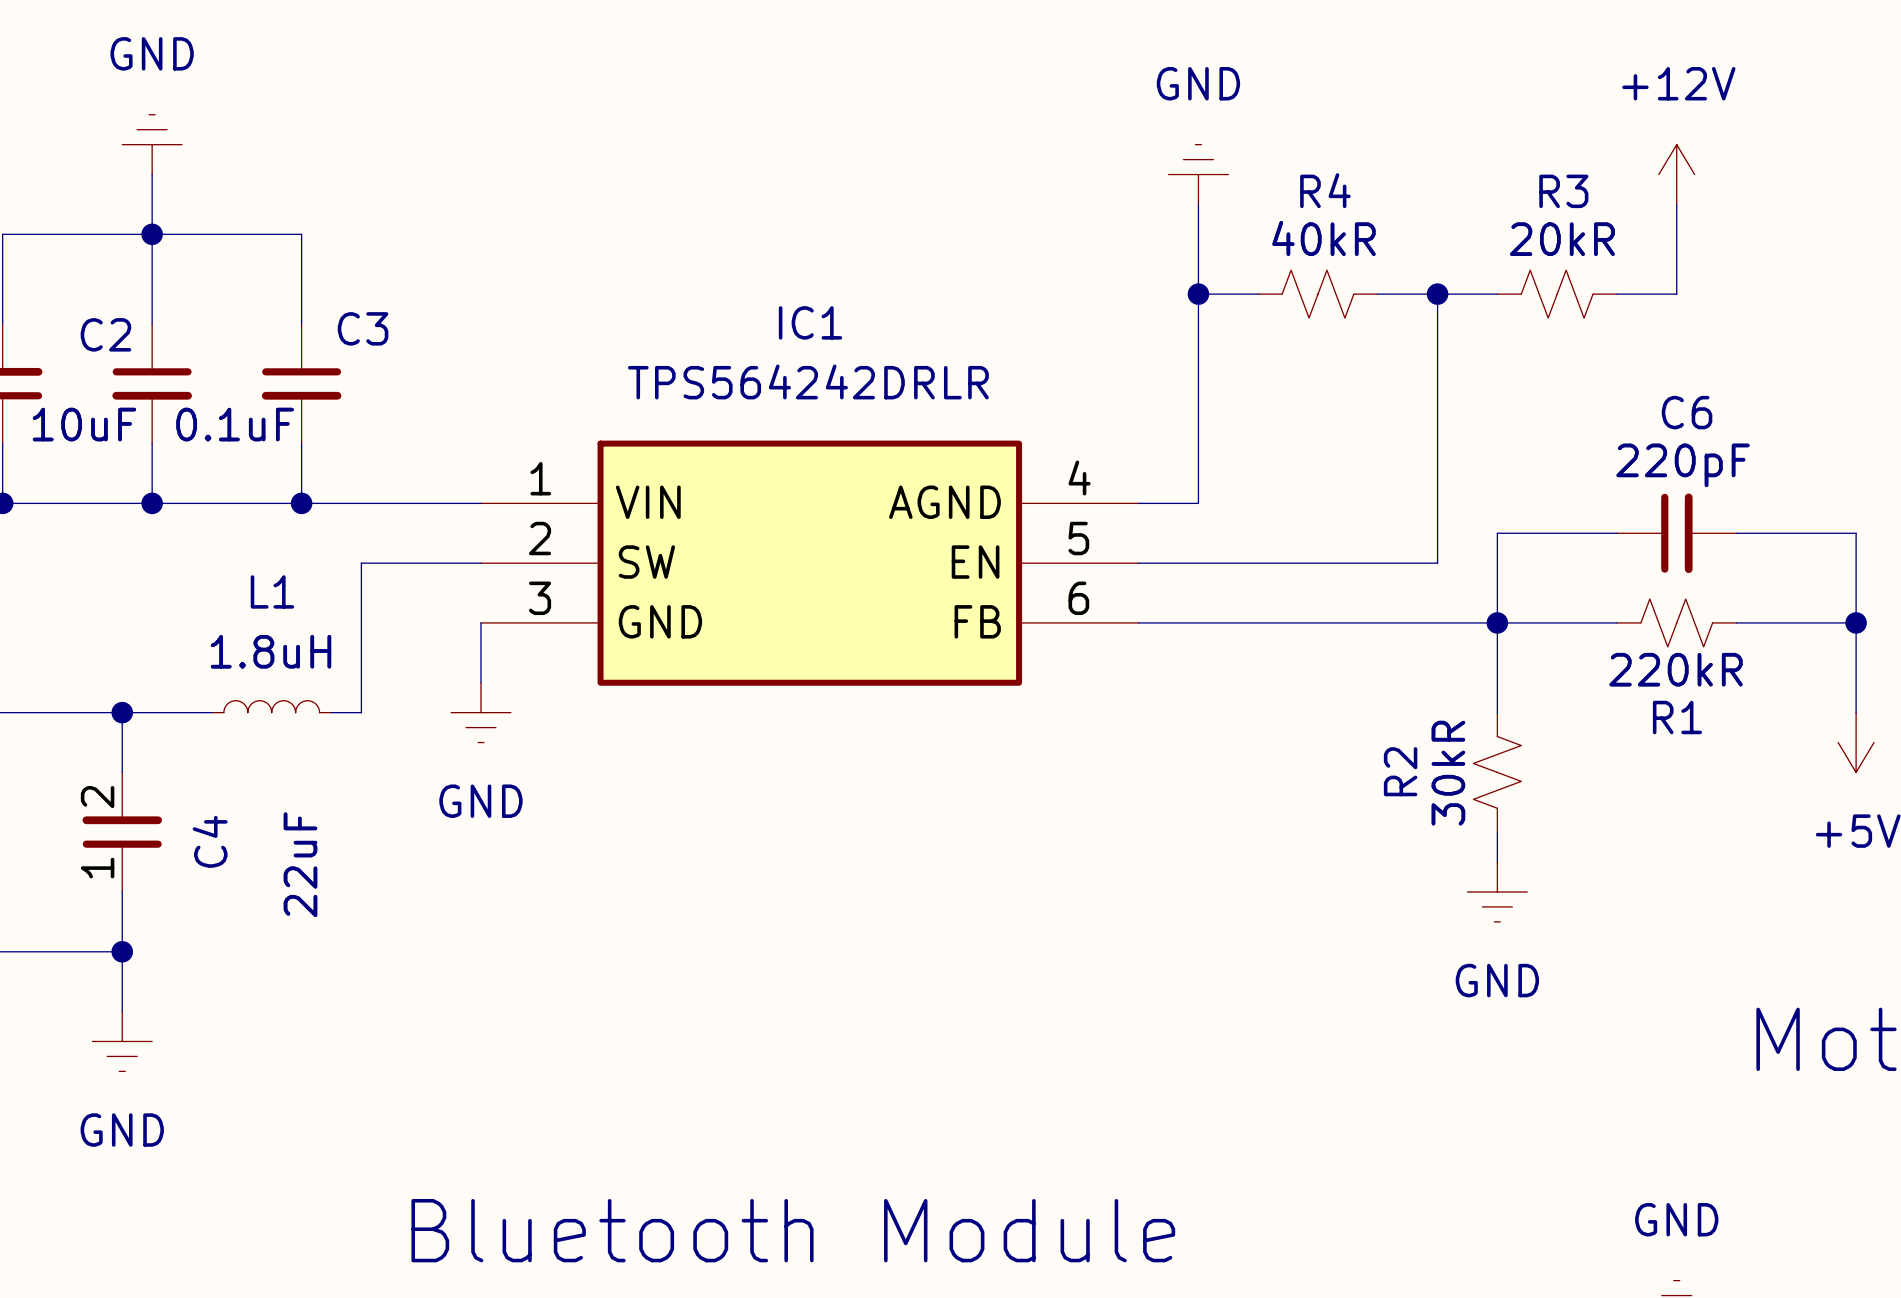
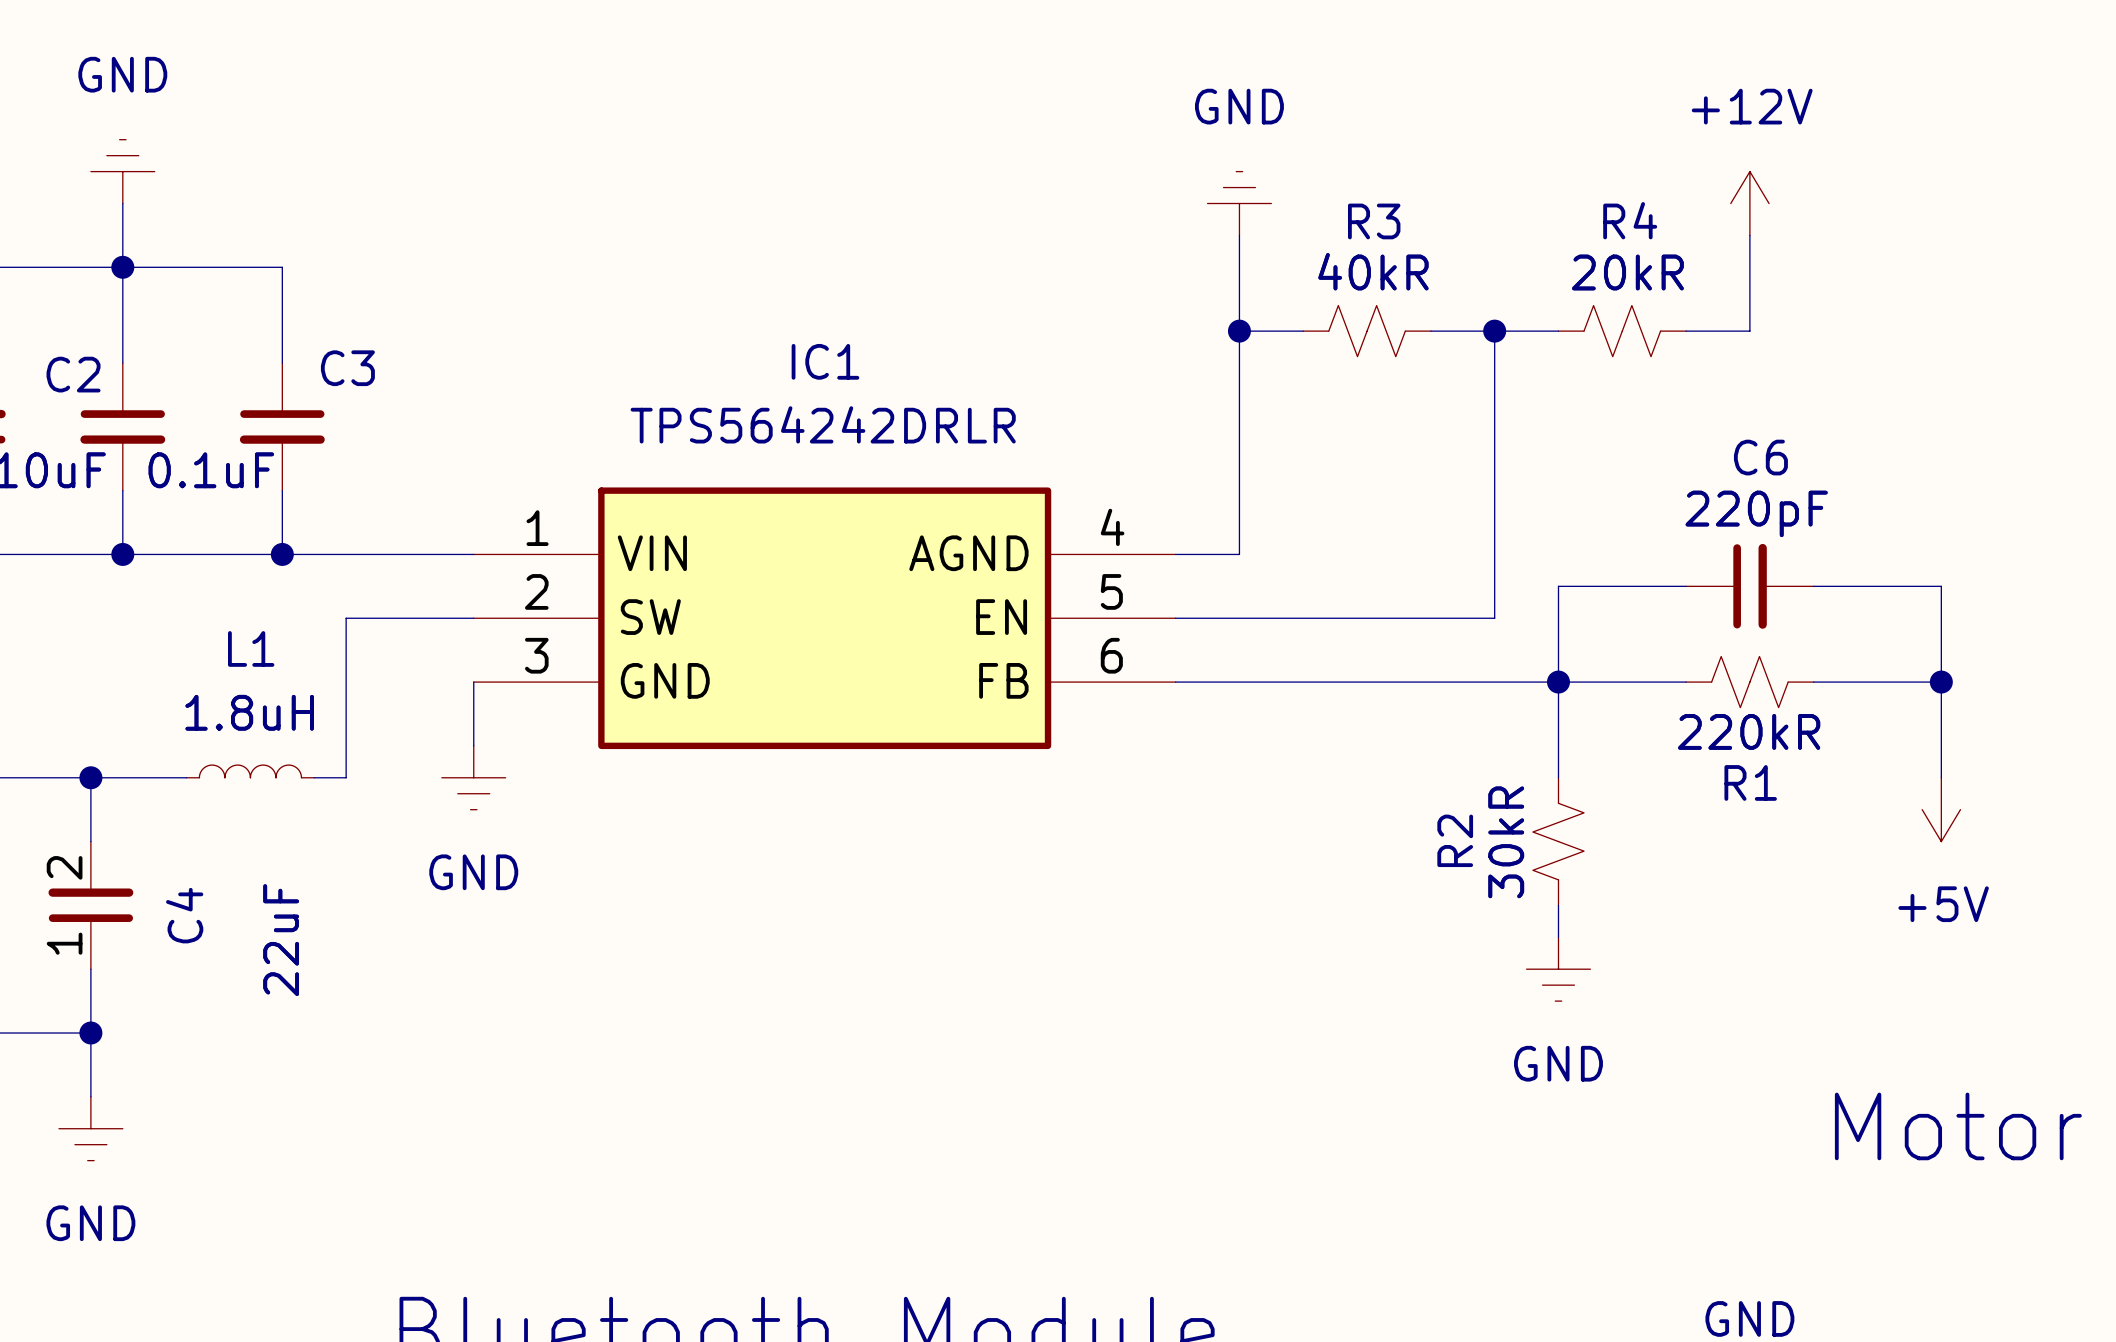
R4 name: R4 (1325, 190) -> R3 (1374, 221)
R3 name: R3 (1563, 191) -> R4 (1630, 220)

